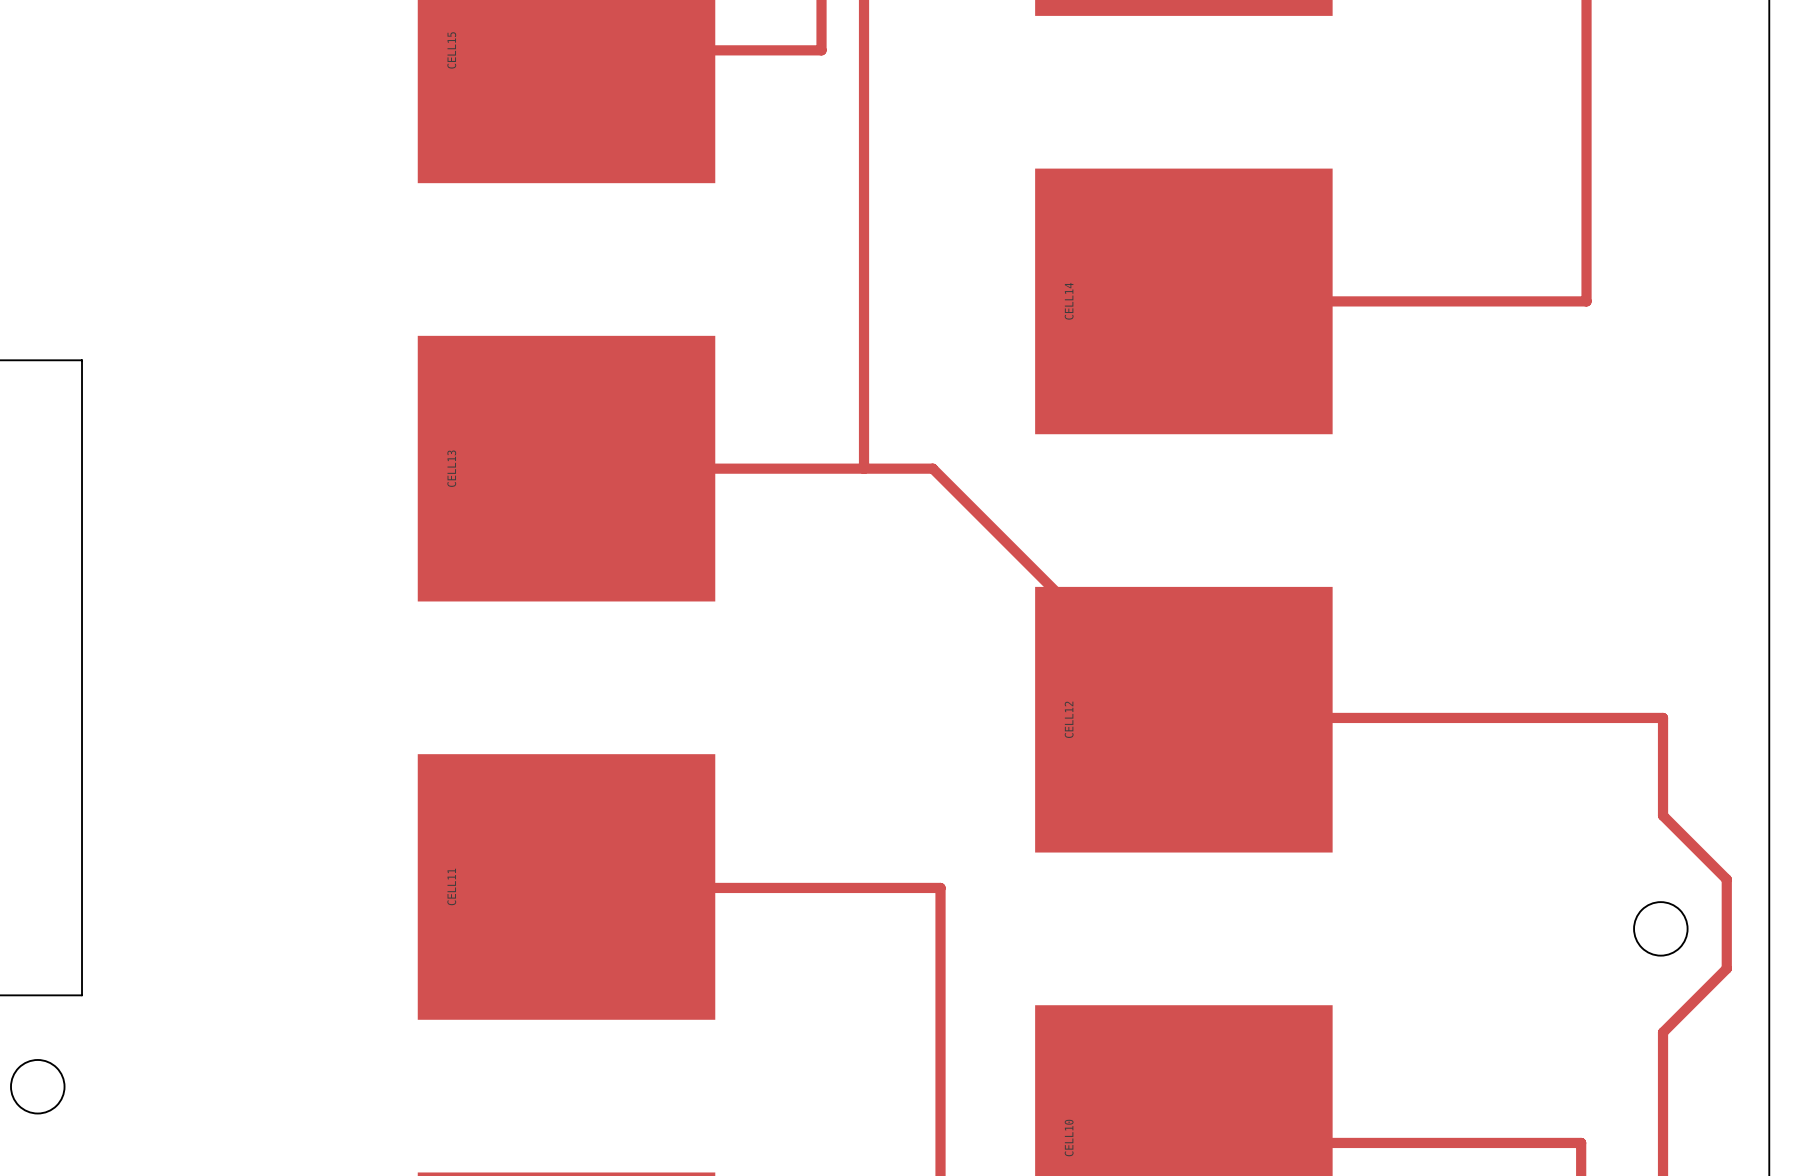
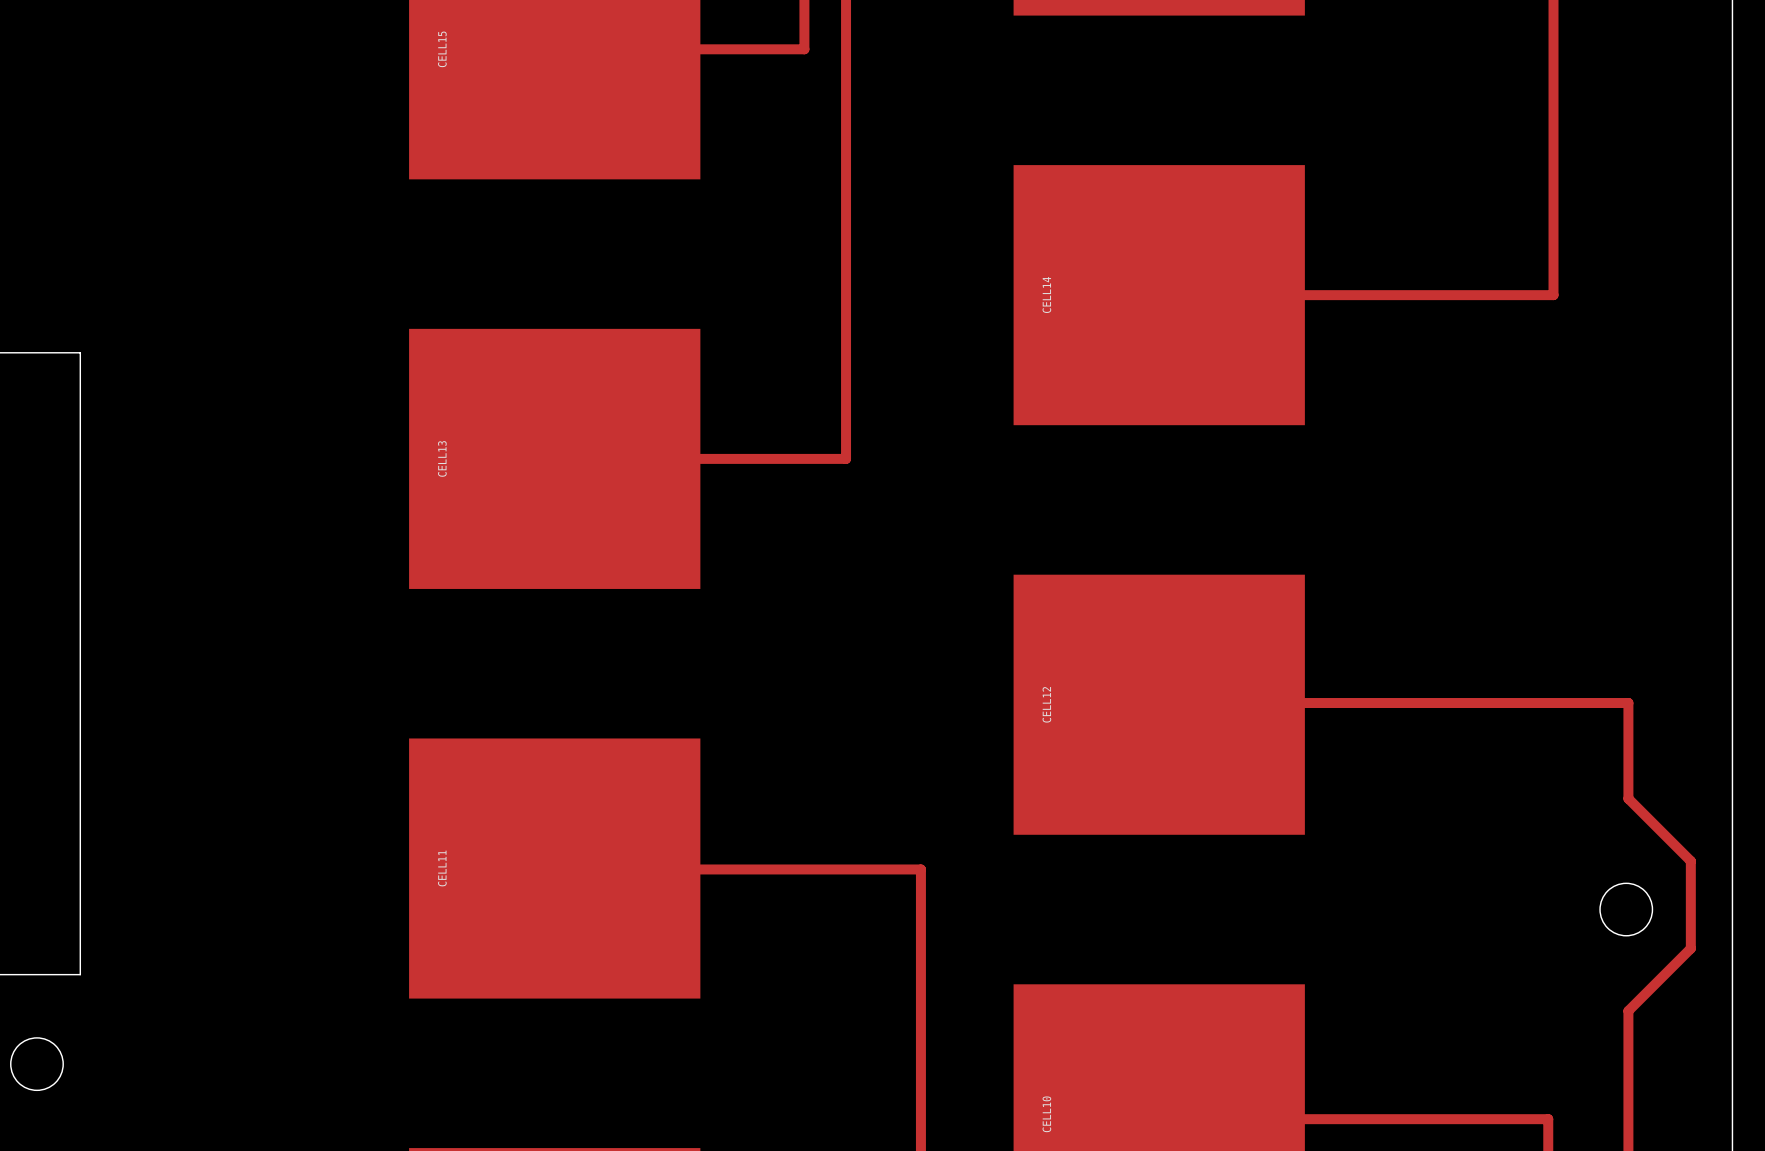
track: (864, 468) (932, 468) (1183, 719) -> none

